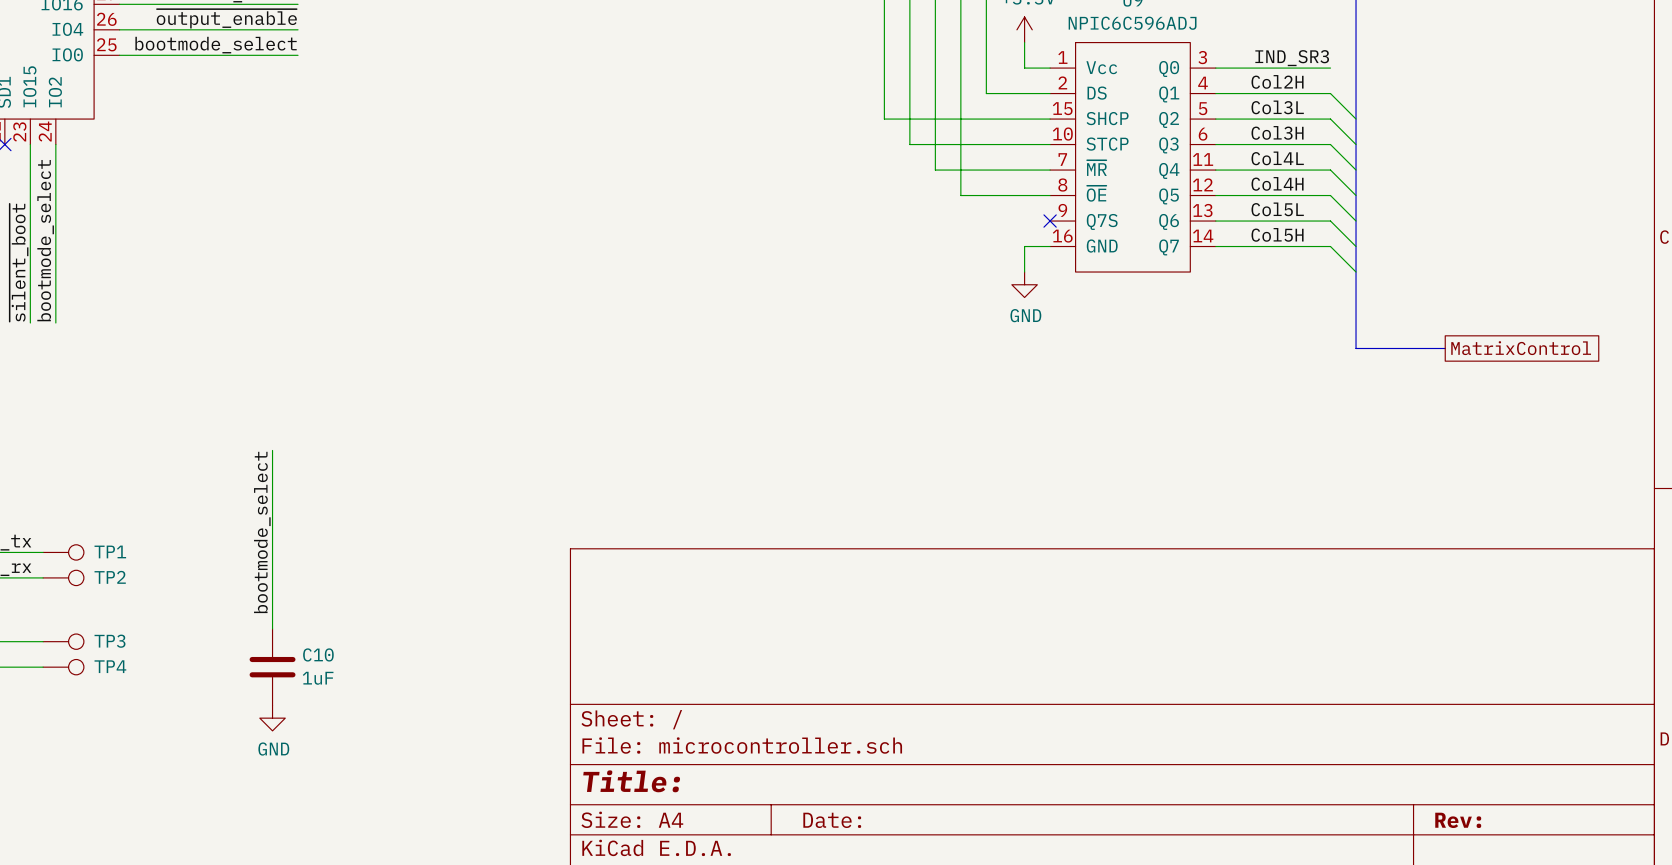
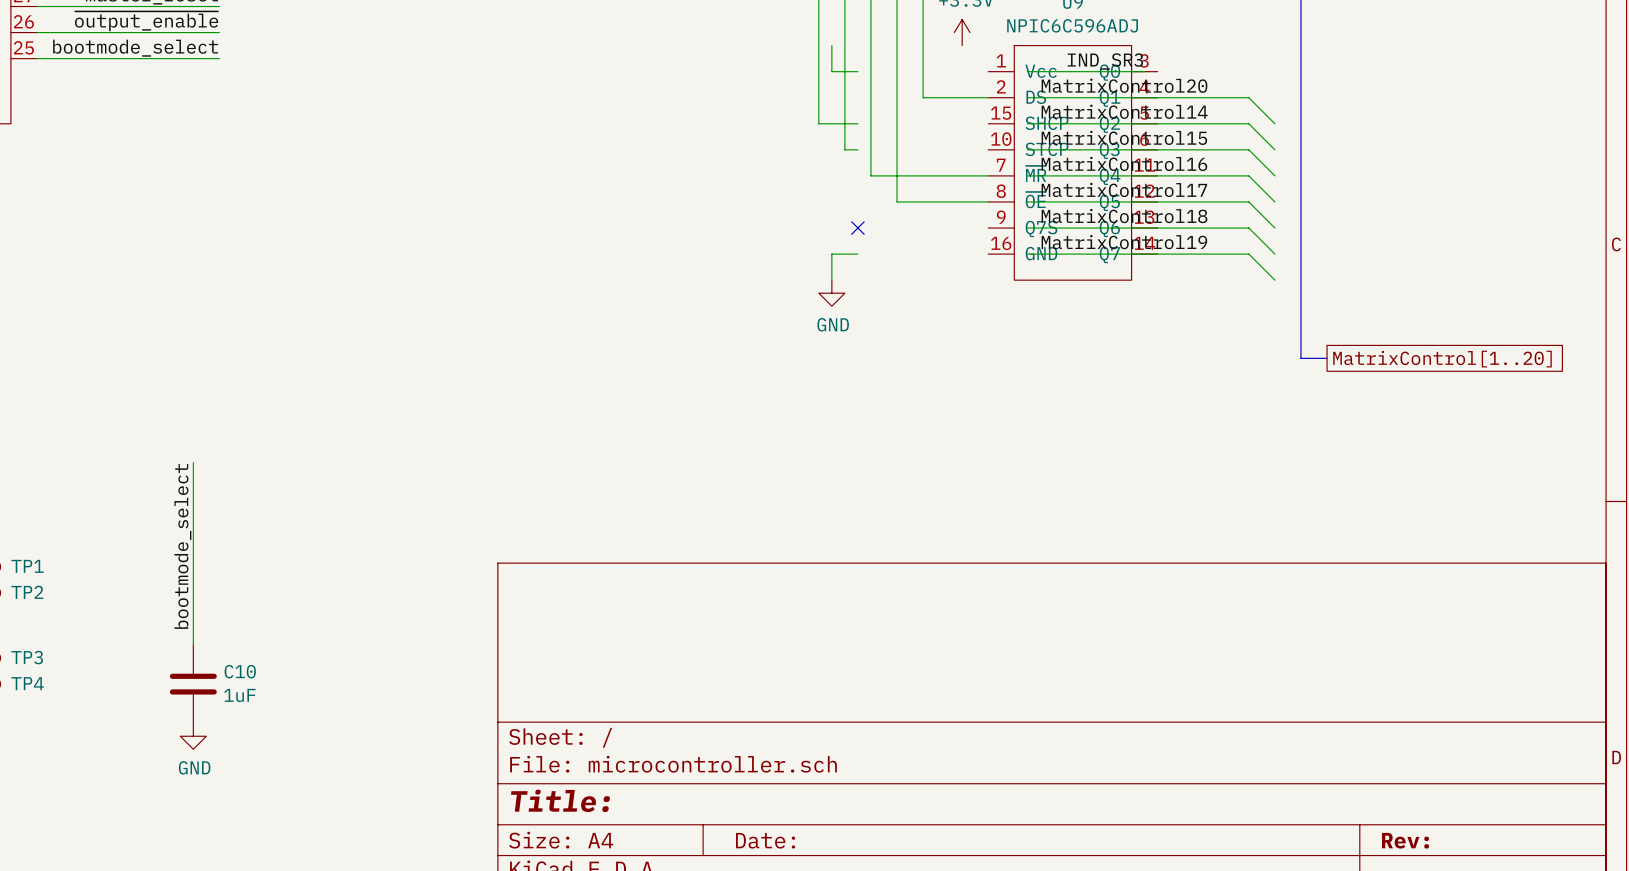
wire: (1024, 42) (1024, 68) (1050, 68) -> (831, 45) (831, 71) (857, 71)
label position: IND_SR3 (1292, 58) -> IND_SR3 (1105, 61)
wire: (1215, 68) (1330, 68) -> (1027, 71) (1144, 71)
label: none -> MatrixControl20 (1124, 85)
label: Col2H (1277, 81) -> none
wire: none -> (1027, 97) (1157, 97)
wire: (1305, 93) (1330, 93) (1356, 119) -> (1248, 97) (1274, 123)
label: none -> MatrixControl14 (1124, 111)
label: Col3L (1277, 107) -> none
wire: (922, 119) (1050, 119) -> (1027, 123) (1157, 123)
wire: (1305, 119) (1330, 119) (1356, 144) -> (1248, 123) (1274, 149)
label: none -> MatrixControl15 (1124, 137)
label: Col3H (1277, 132) -> none
wire: (922, 144) (1050, 144) -> (1027, 149) (1157, 149)
wire: (1305, 144) (1330, 144) (1356, 170) -> (1248, 149) (1274, 175)
label: none -> MatrixControl16 (1124, 163)
label: Col4L (1277, 158) -> none
wire: none -> (1027, 175) (1157, 175)
wire: (1305, 170) (1330, 170) (1356, 195) -> (1248, 175) (1274, 201)
label: none -> MatrixControl17 (1124, 189)
label: Col4H (1277, 183) -> none
wire: none -> (1027, 201) (1157, 201)
wire: (1305, 195) (1330, 195) (1356, 221) -> (1248, 201) (1274, 228)
label: none -> MatrixControl18 (1124, 216)
label: Col5L (1277, 209) -> none
no-connect mark: none -> (857, 228)
no-connect mark: (1050, 221) -> none
wire: none -> (1027, 228) (1157, 228)
wire: (1305, 221) (1330, 221) (1356, 246) -> (1248, 228) (1274, 254)
label: none -> MatrixControl19 (1124, 242)
label: Col5H (1277, 234) -> none
wire: (1050, 246) (1024, 246) (1024, 272) -> (857, 254) (831, 254) (831, 280)
wire: none -> (1027, 254) (1157, 254)
wire: (1305, 246) (1330, 246) (1356, 272) -> (1248, 254) (1274, 280)
power symbol position: GND (1024, 284) -> GND (831, 293)
bus: (1381, 348) (1445, 348) -> none
global label: MatrixControl (1521, 348) -> MatrixControl[1..20] (1442, 359)

